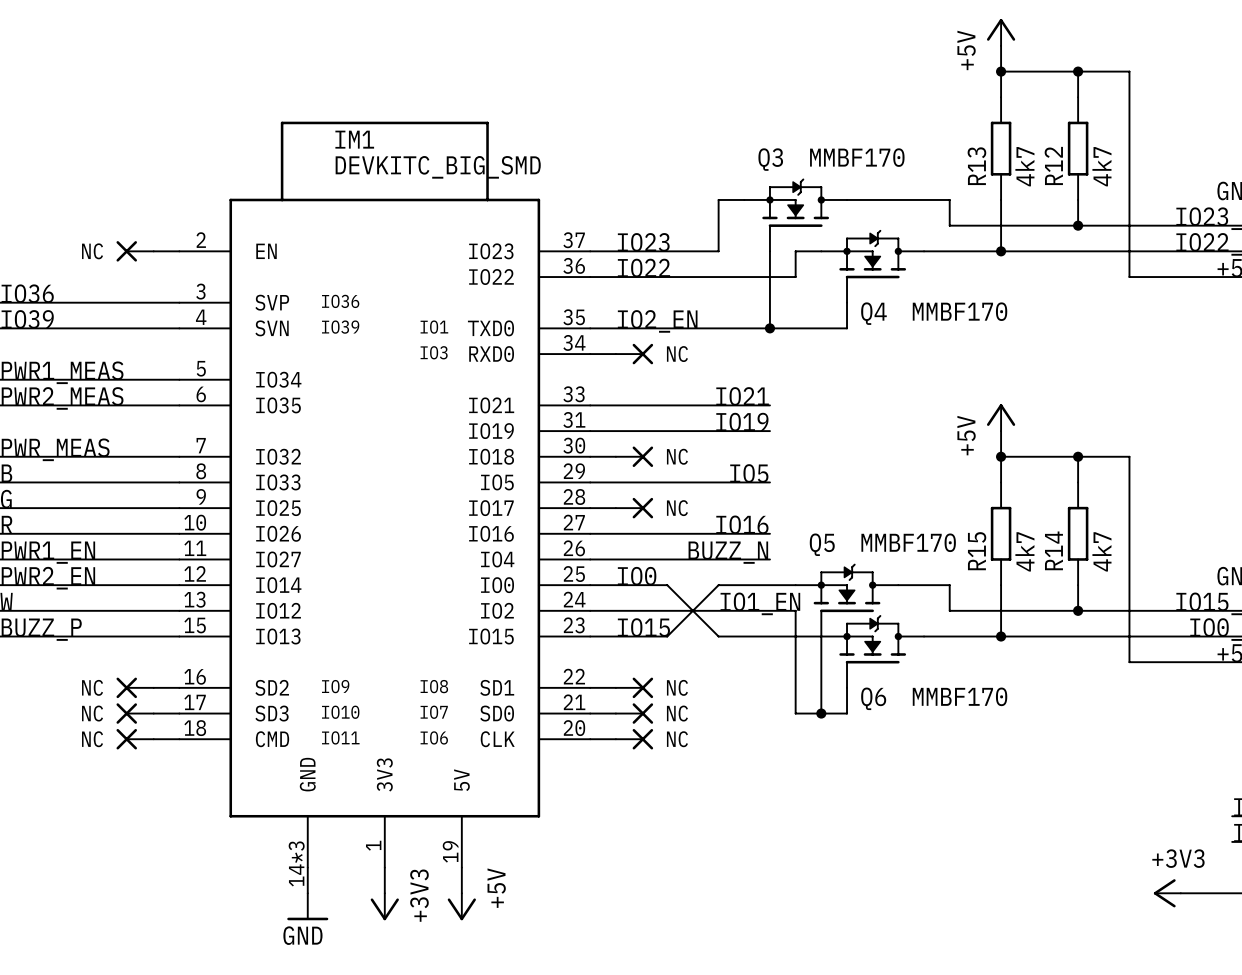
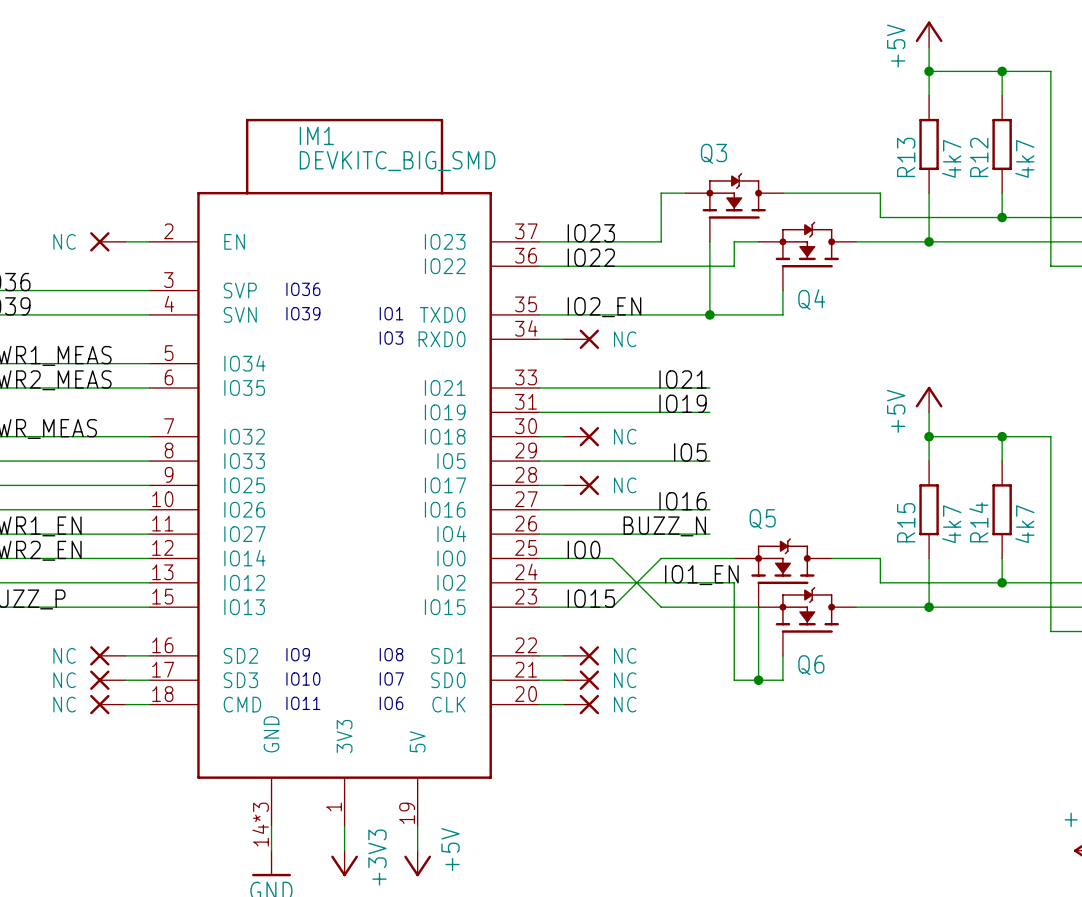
Q3 value: MMBF170 (857, 157) -> none
Q4 value: MMBF170 (960, 311) -> none
Q5 value: MMBF170 (908, 542) -> none
Q6 value: MMBF170 (960, 696) -> none

